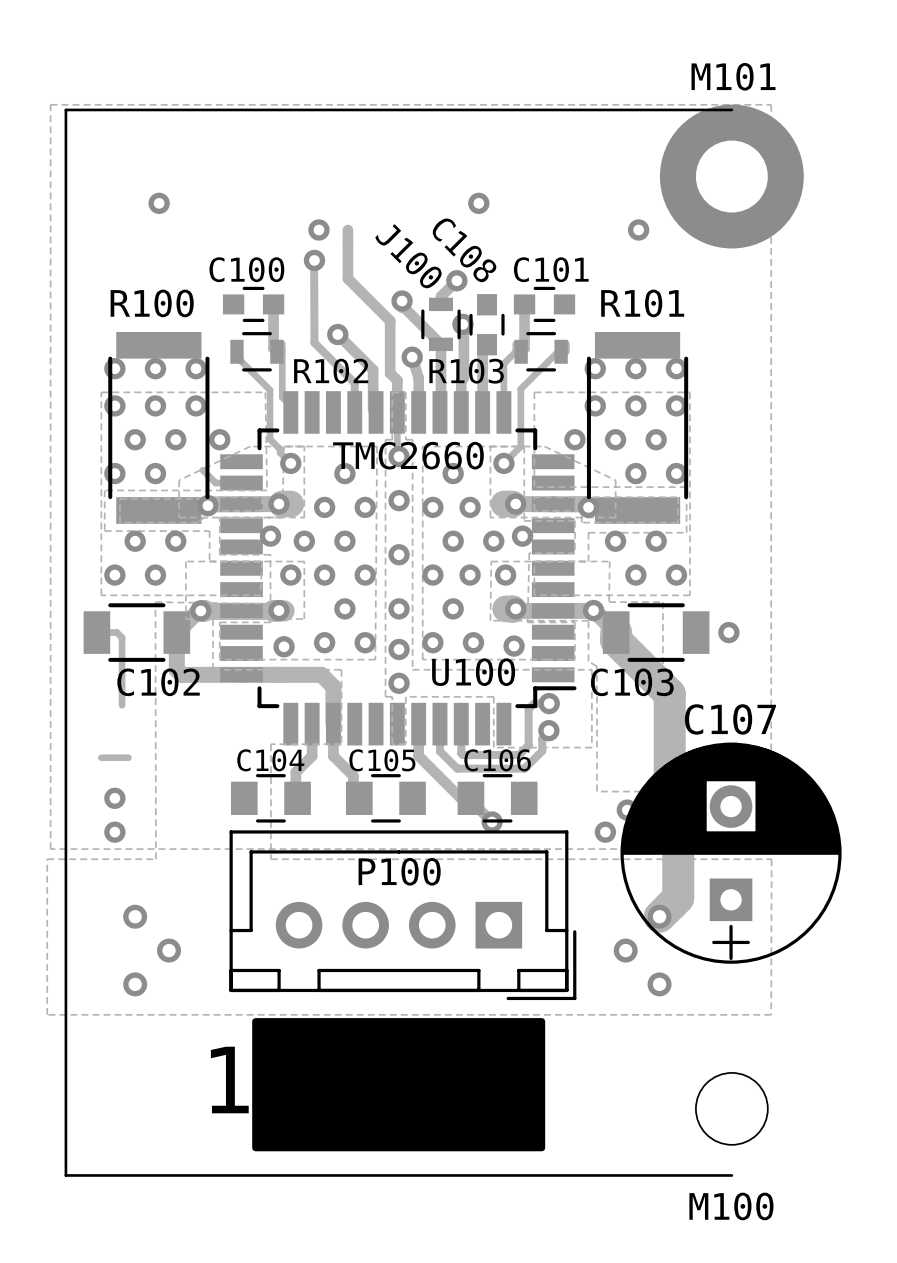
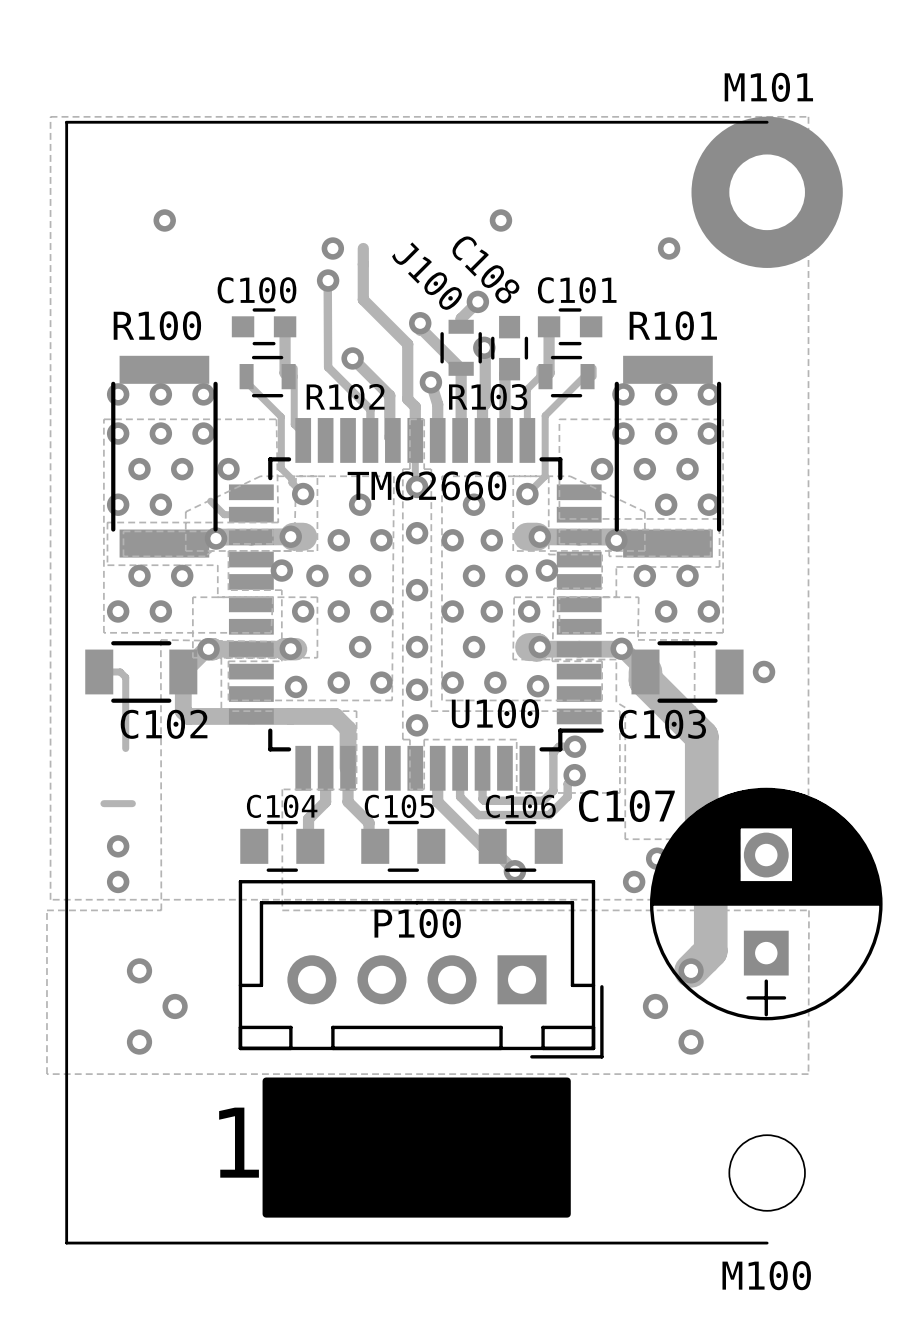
C107 name position: C107 (730, 719) -> C107 (626, 806)

